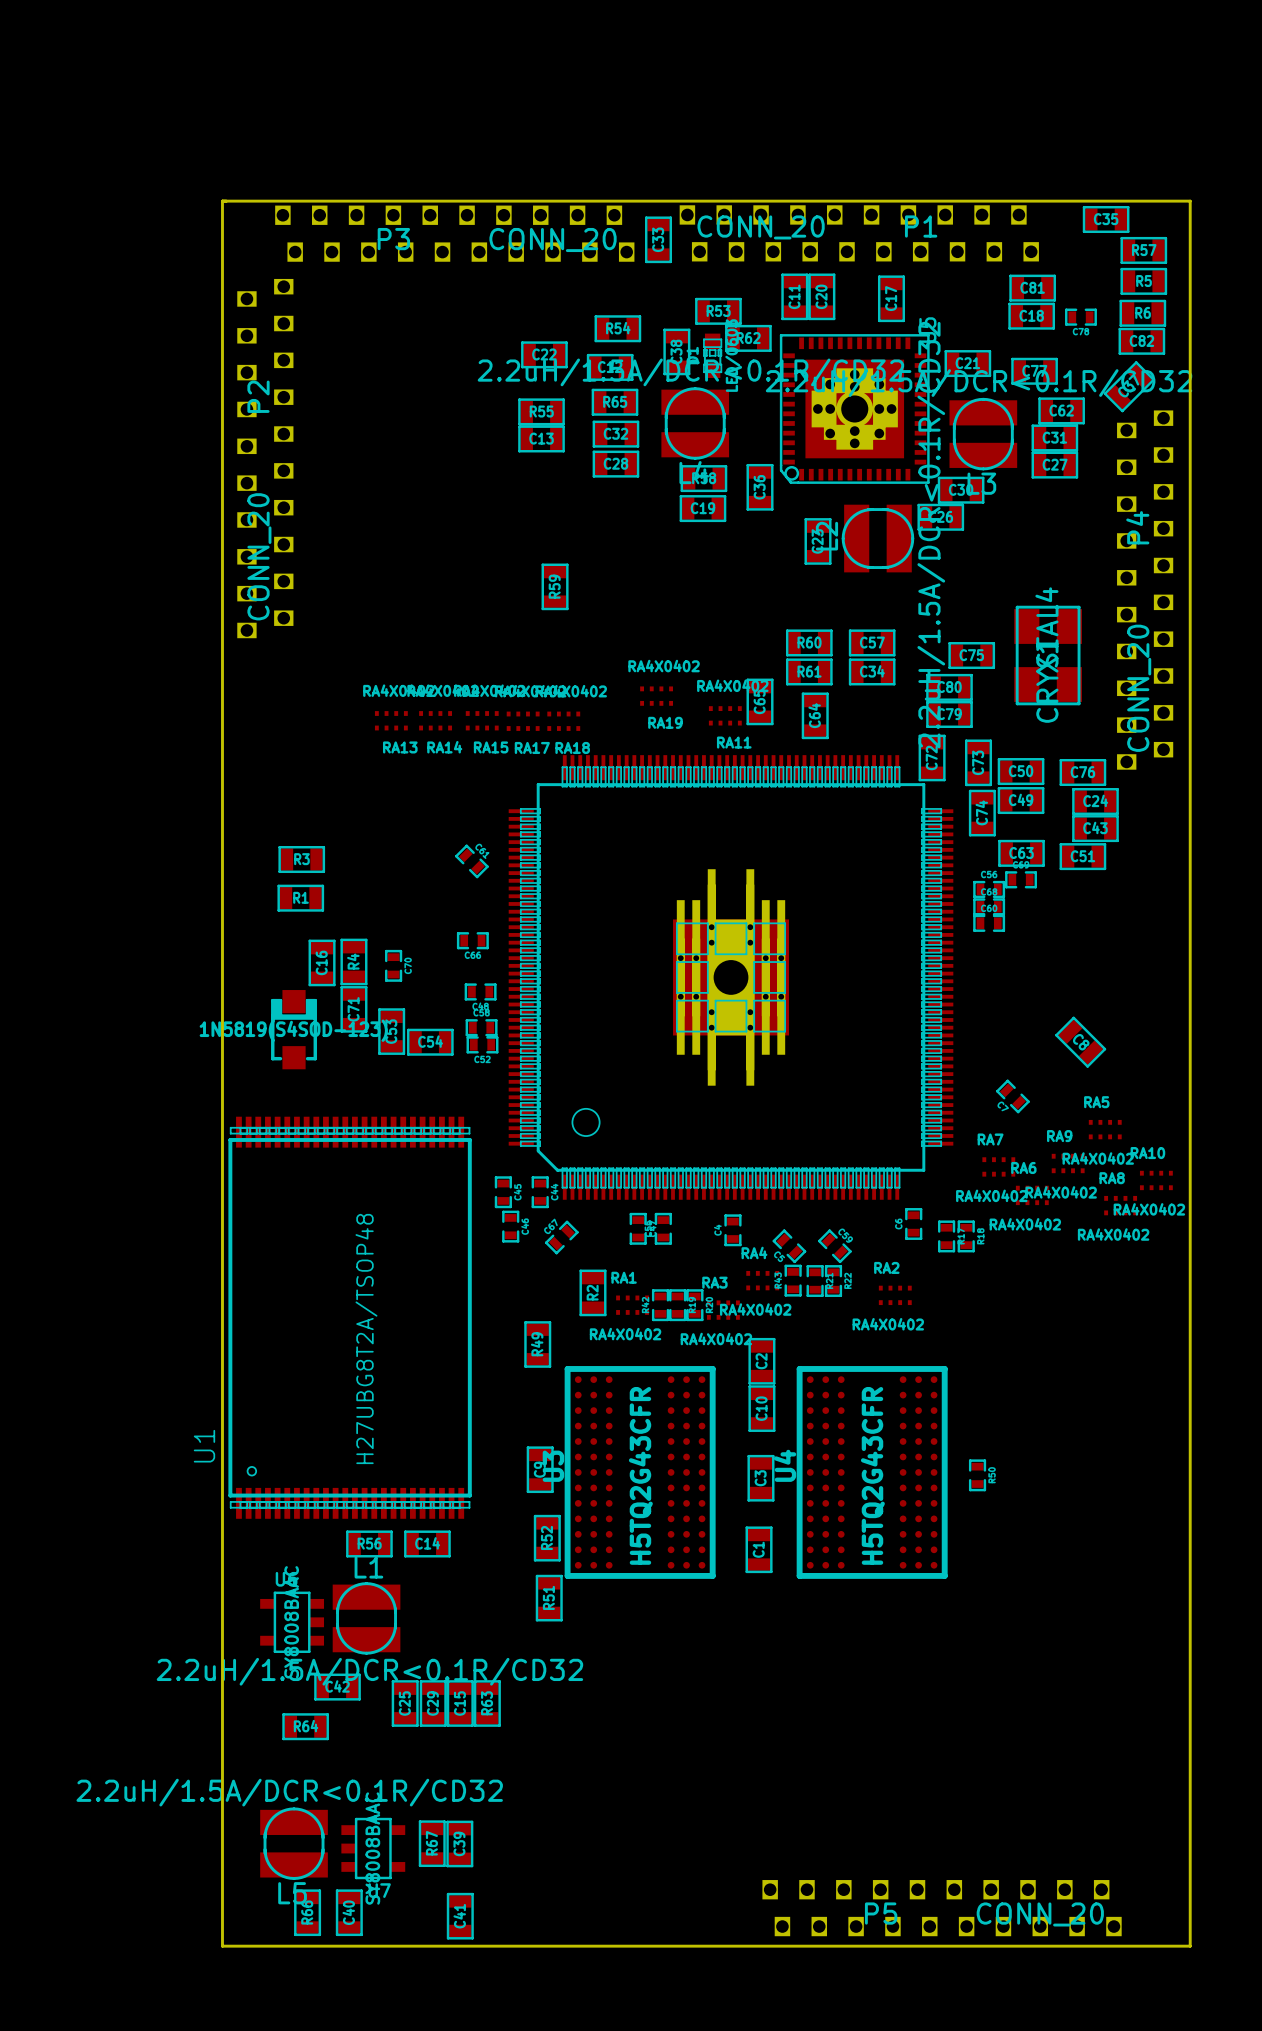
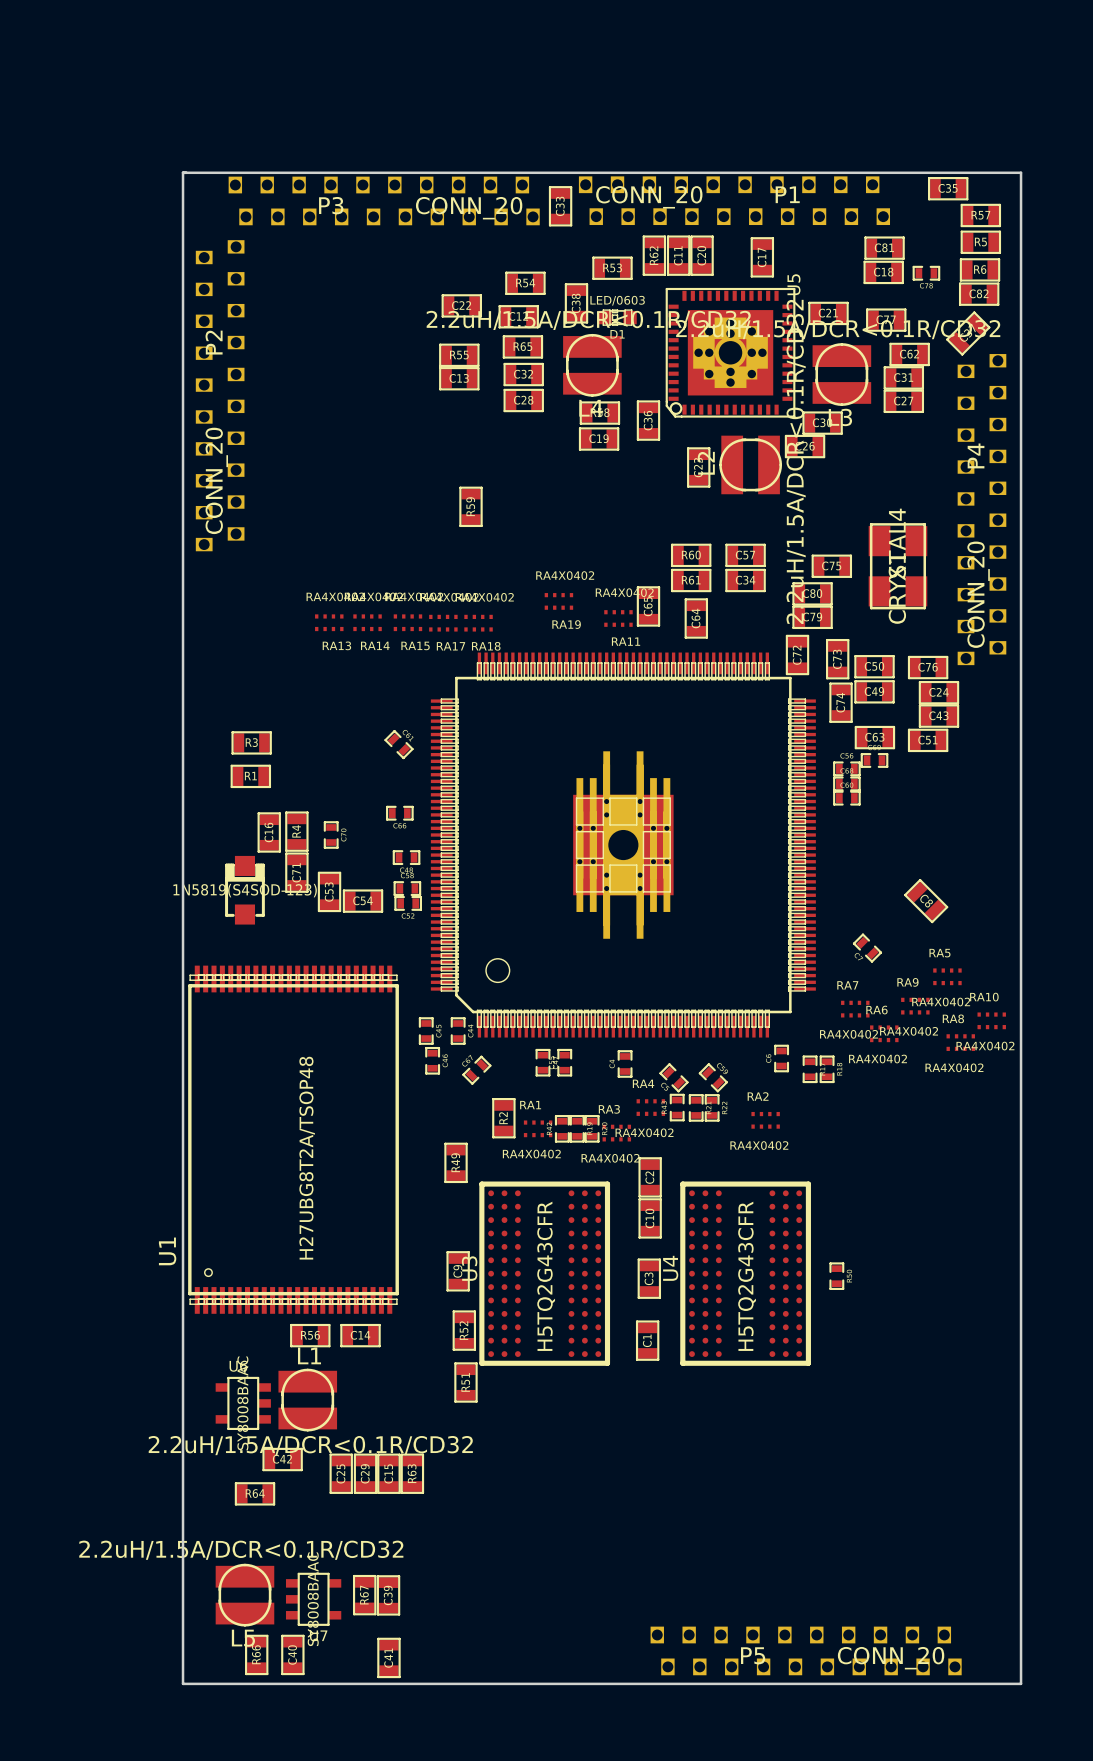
R62 rotation: 0° (748, 338) -> 90° clockwise (654, 255)
R62 position: (748, 338) -> (654, 255)
D1 rotation: 0° (712, 355) -> 90° counterclockwise (617, 317)

